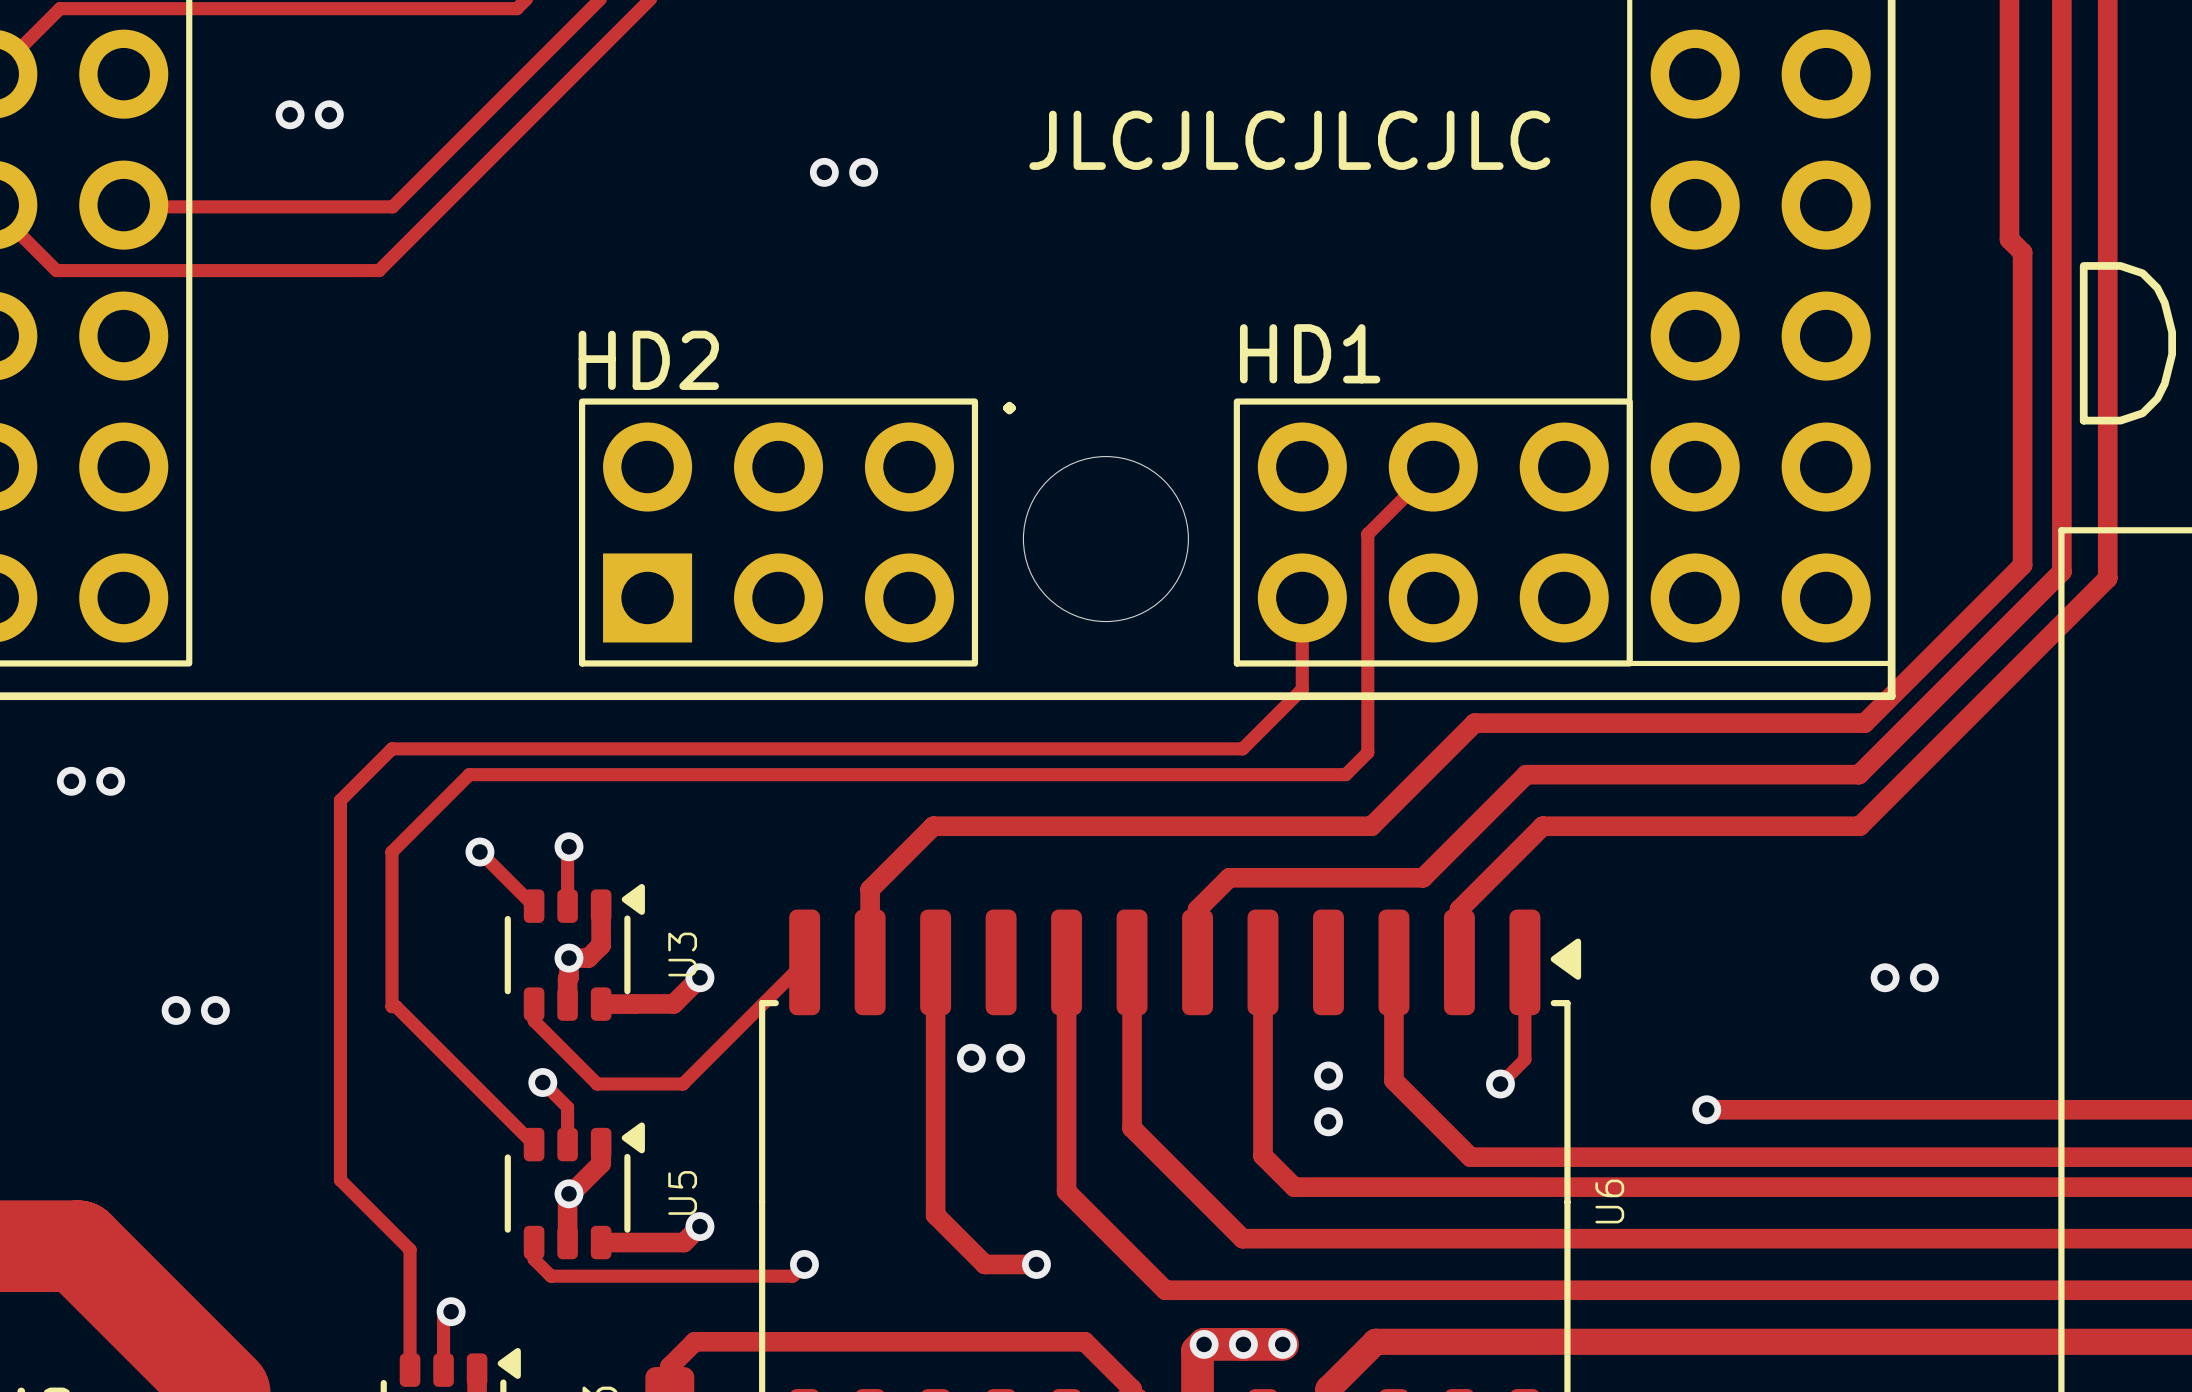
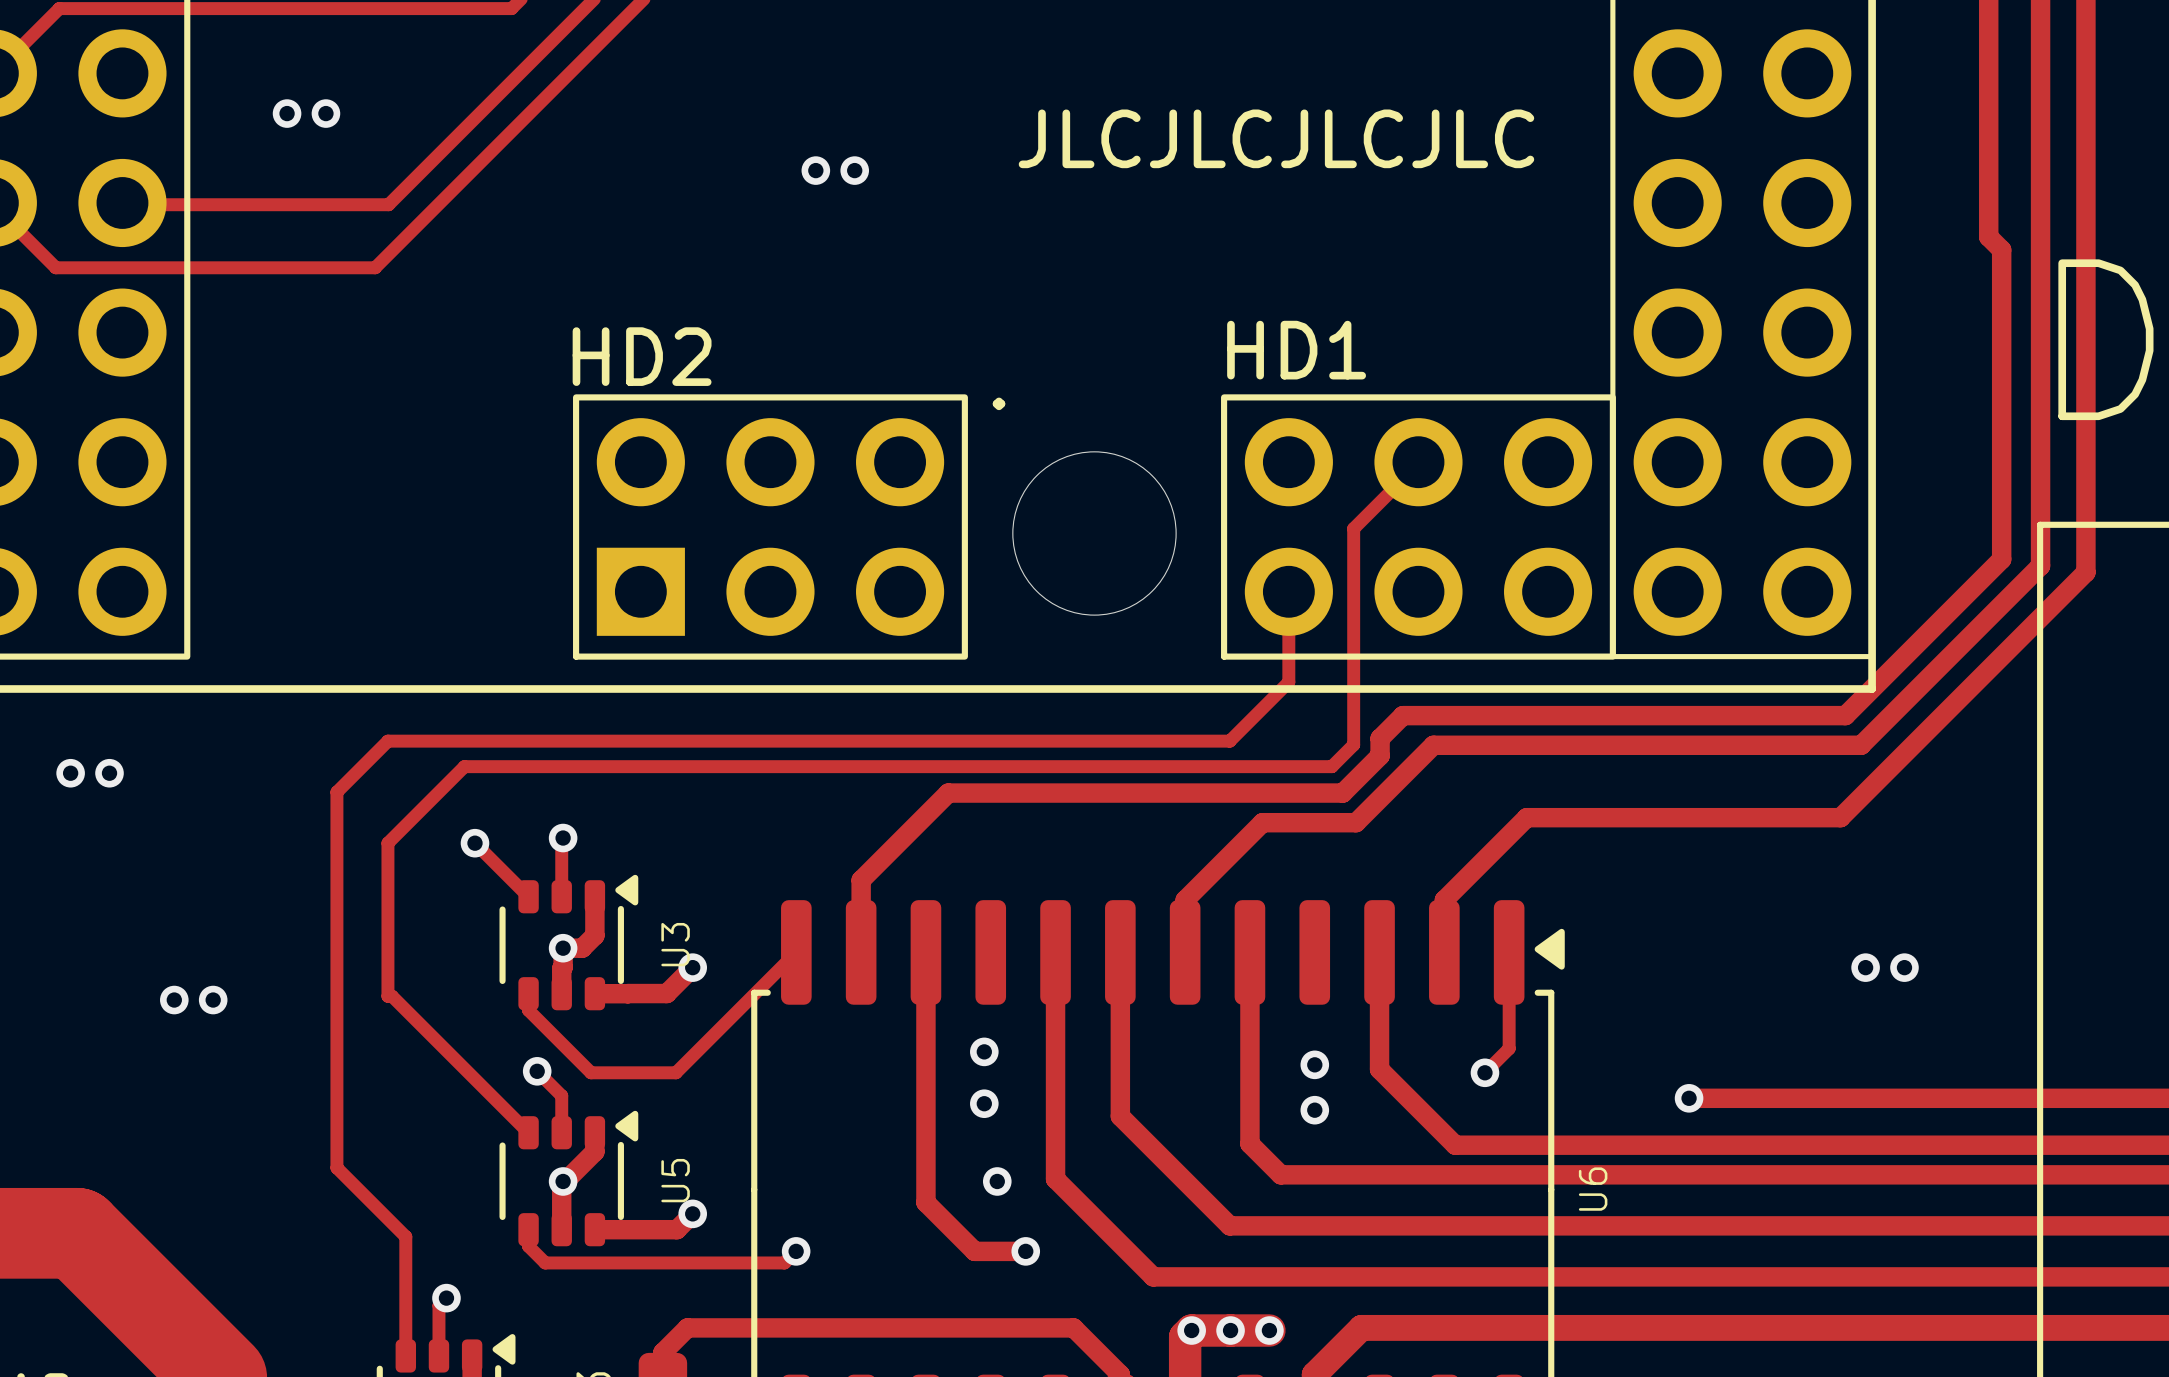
track: (1474, 723) (1371, 826) (933, 826) -> (1459, 715) (1402, 715) (1380, 738) (1380, 755) (1342, 793) (948, 793) (923, 817)
track: (1880, 753) (1859, 774) (1526, 774) (1423, 877) (1229, 877) -> (1861, 745) (1433, 745) (1356, 822) (1262, 822) (1216, 868)
via: (971, 1058) -> none
via: (1010, 1058) -> none
via: none -> (984, 1051)
via: none -> (984, 1103)
via: none -> (997, 1181)

